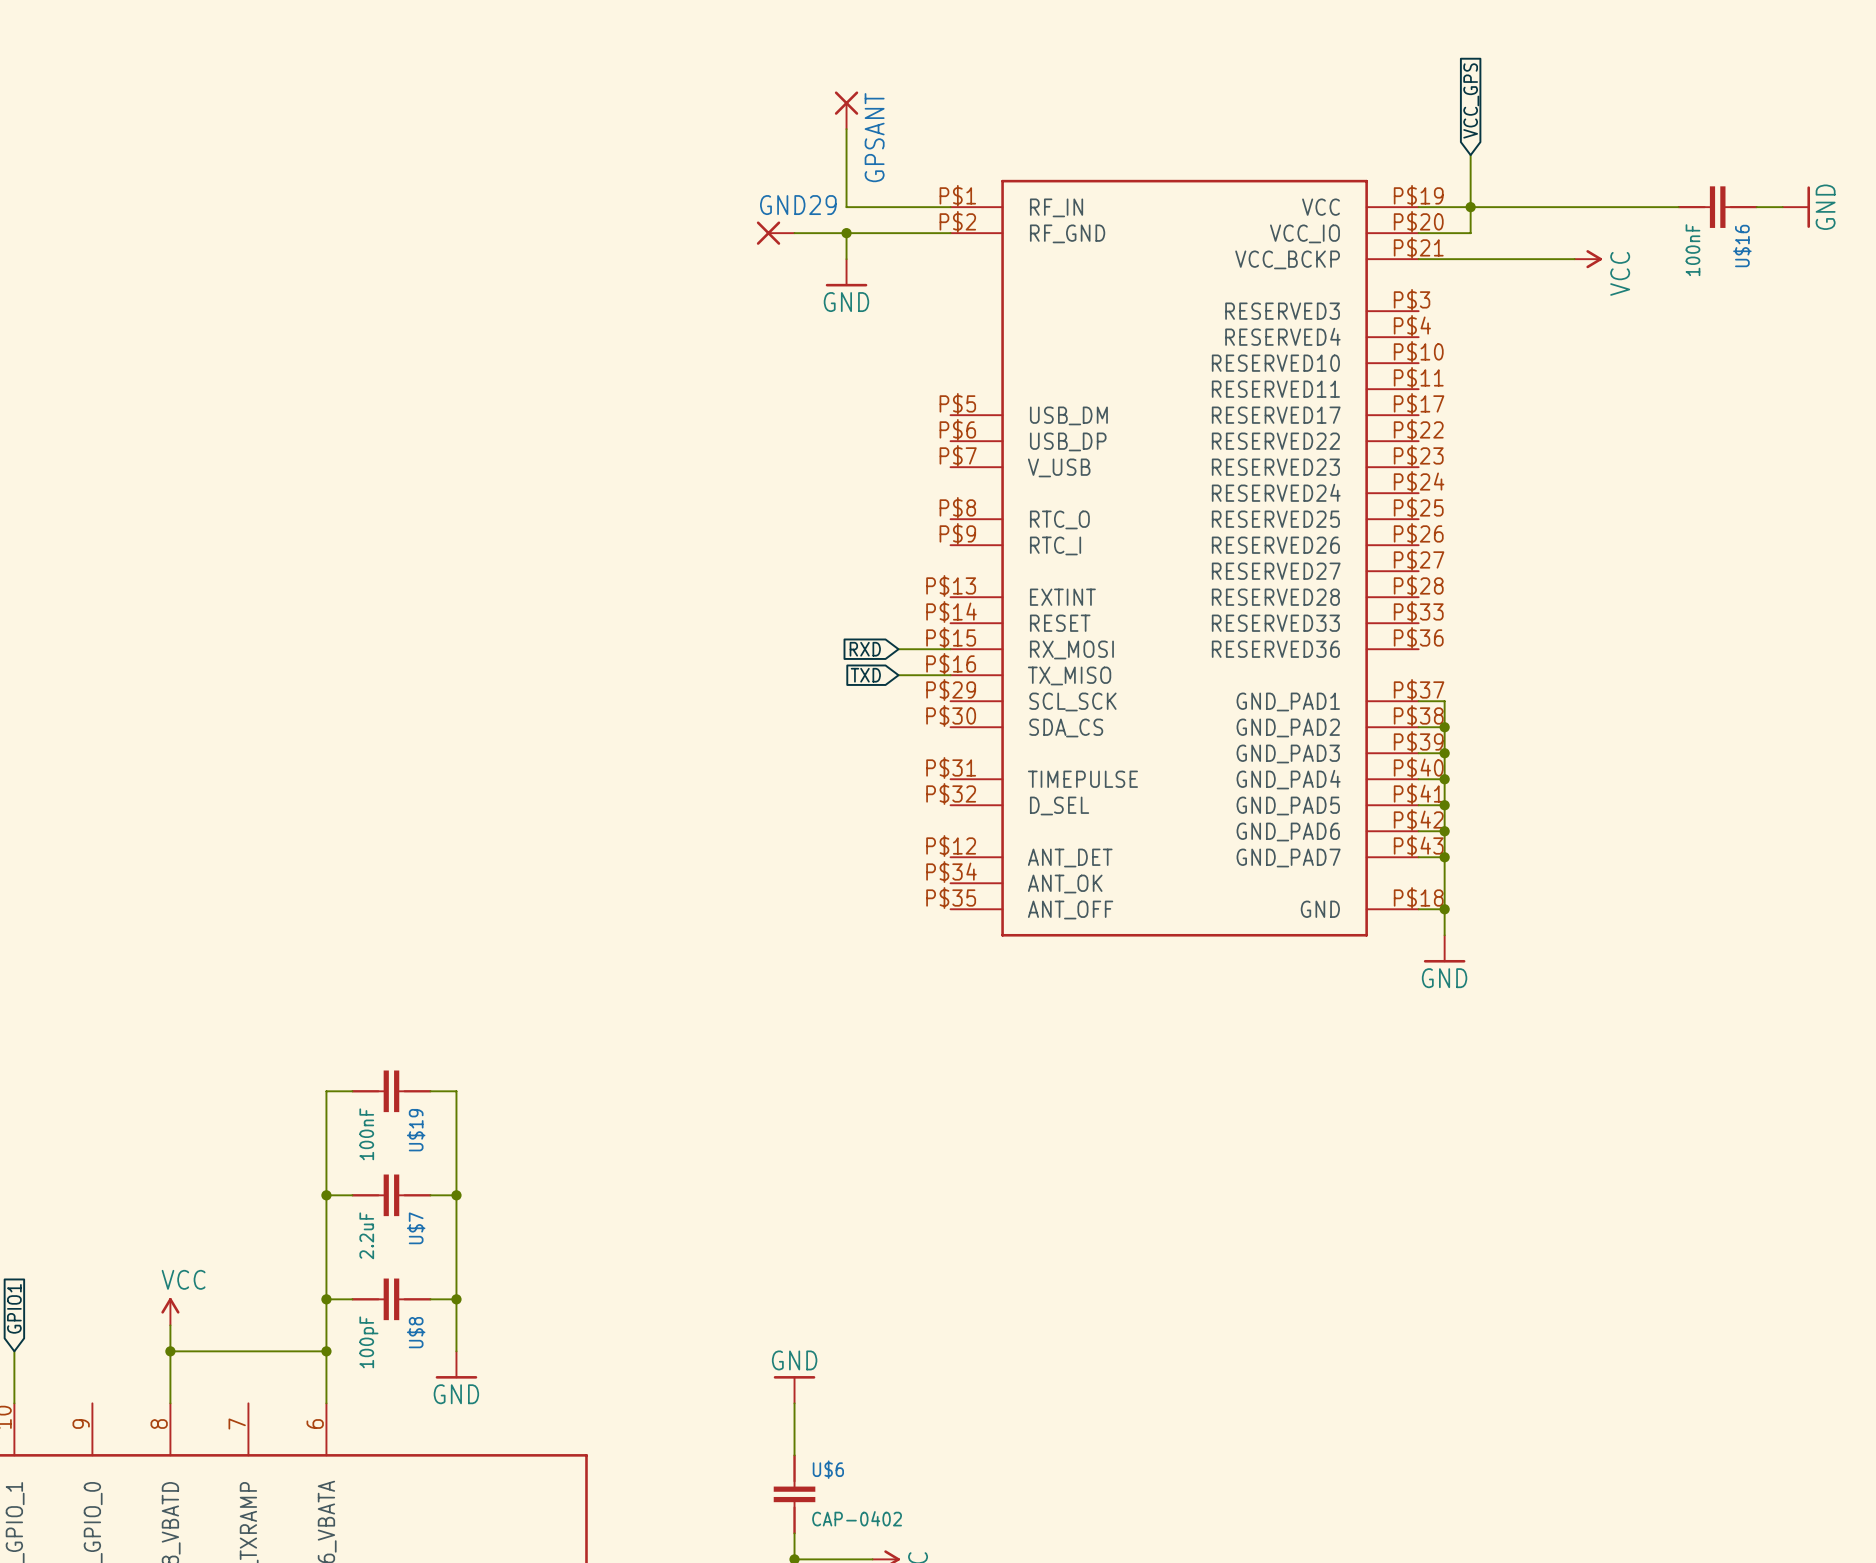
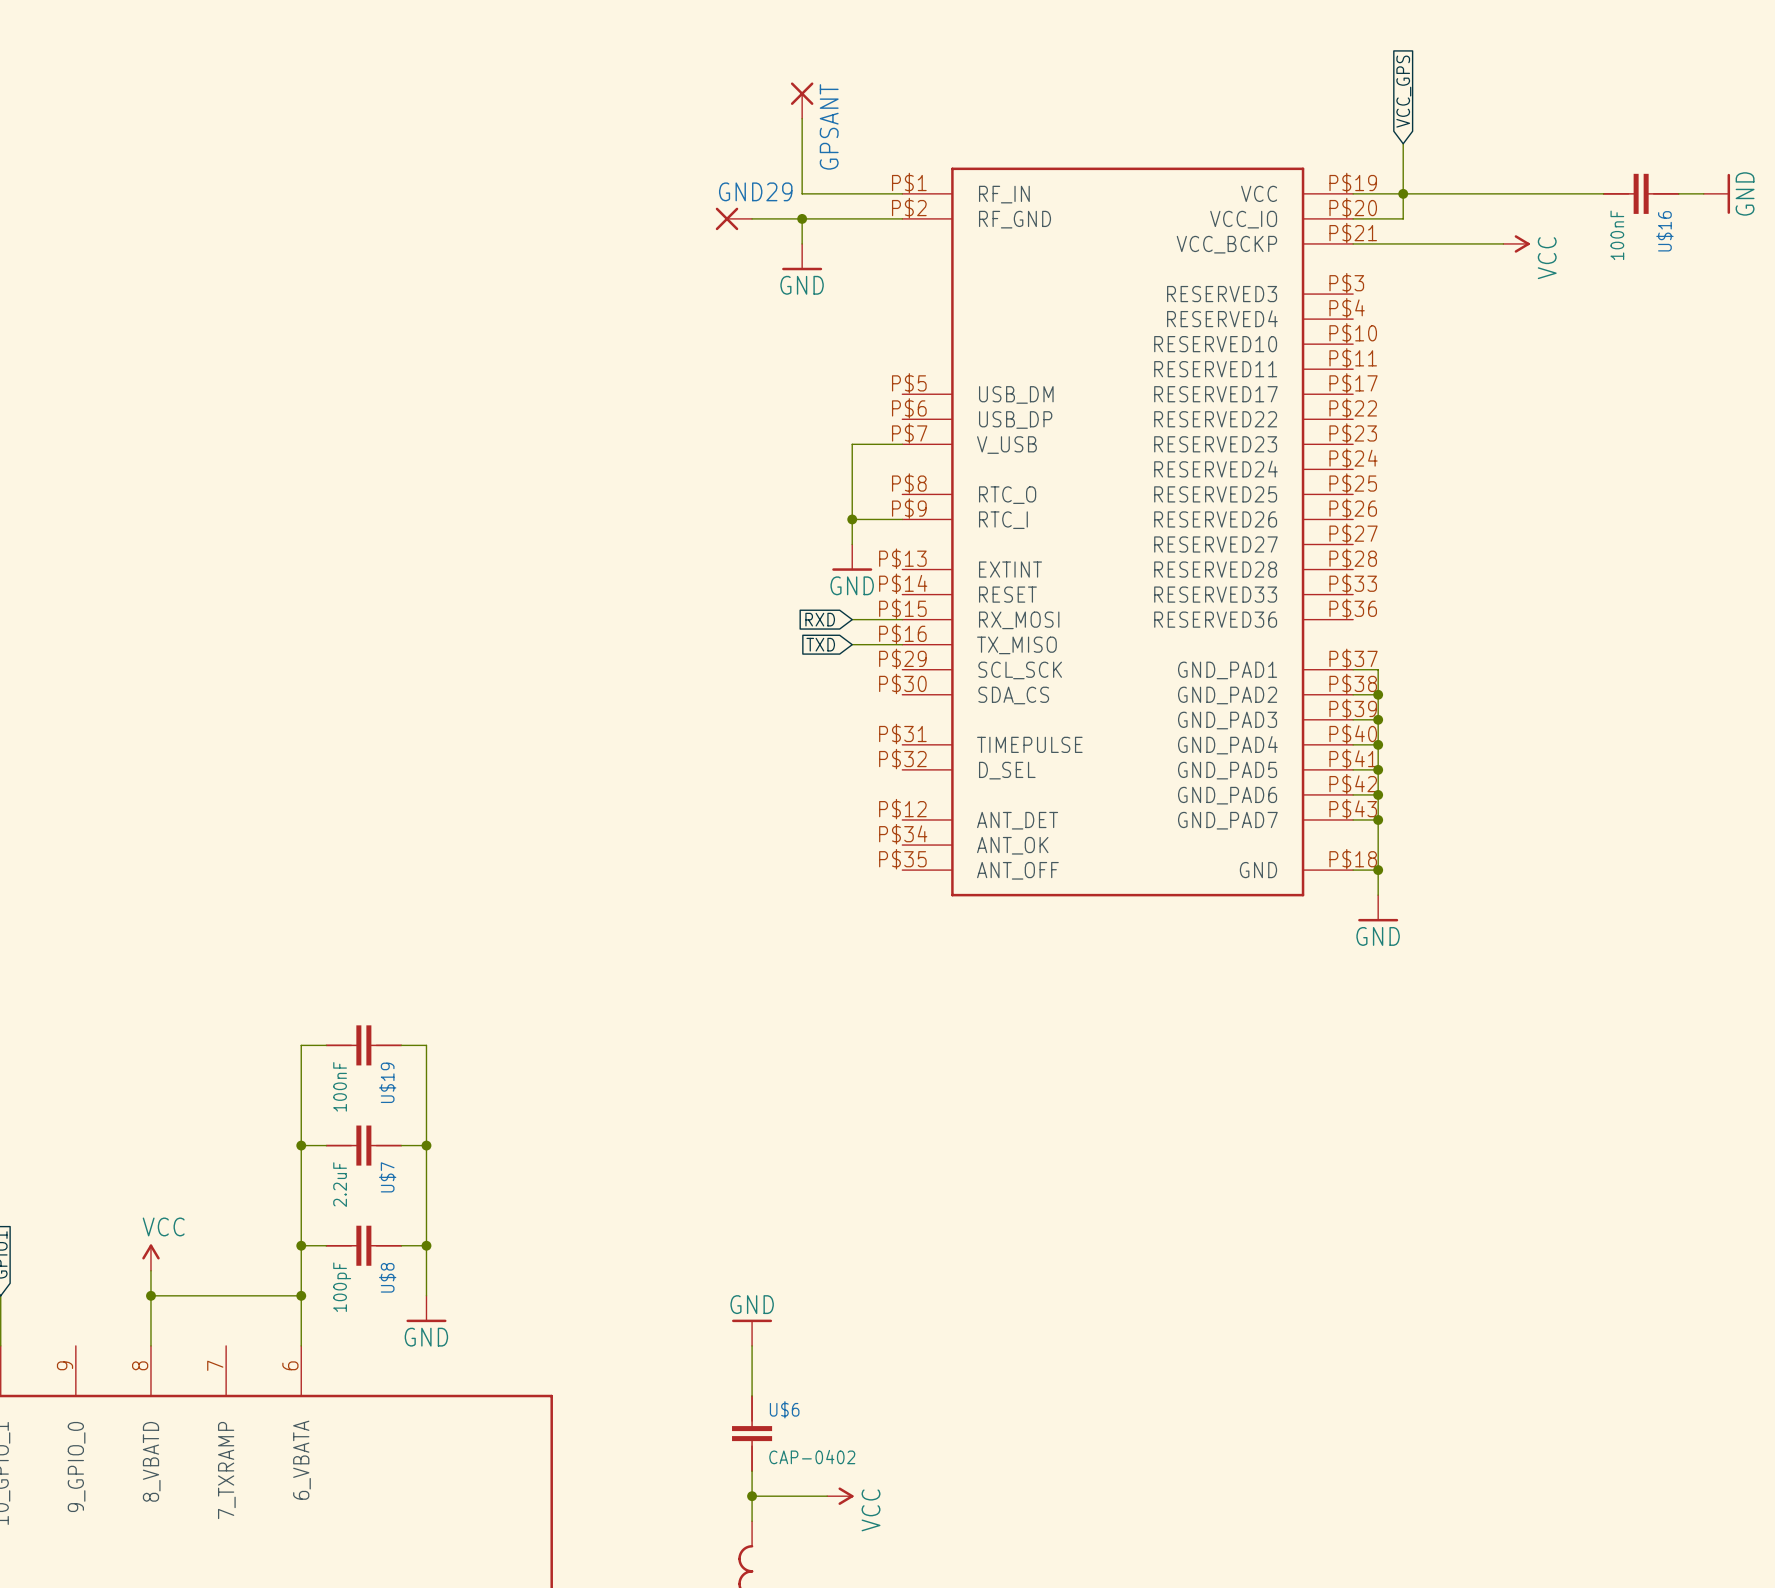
wire: none -> (902, 444) (852, 444) (852, 544)
wire: none -> (852, 519) (902, 519)
junction: none -> (852, 519)
power symbol: none -> GND (852, 557)

